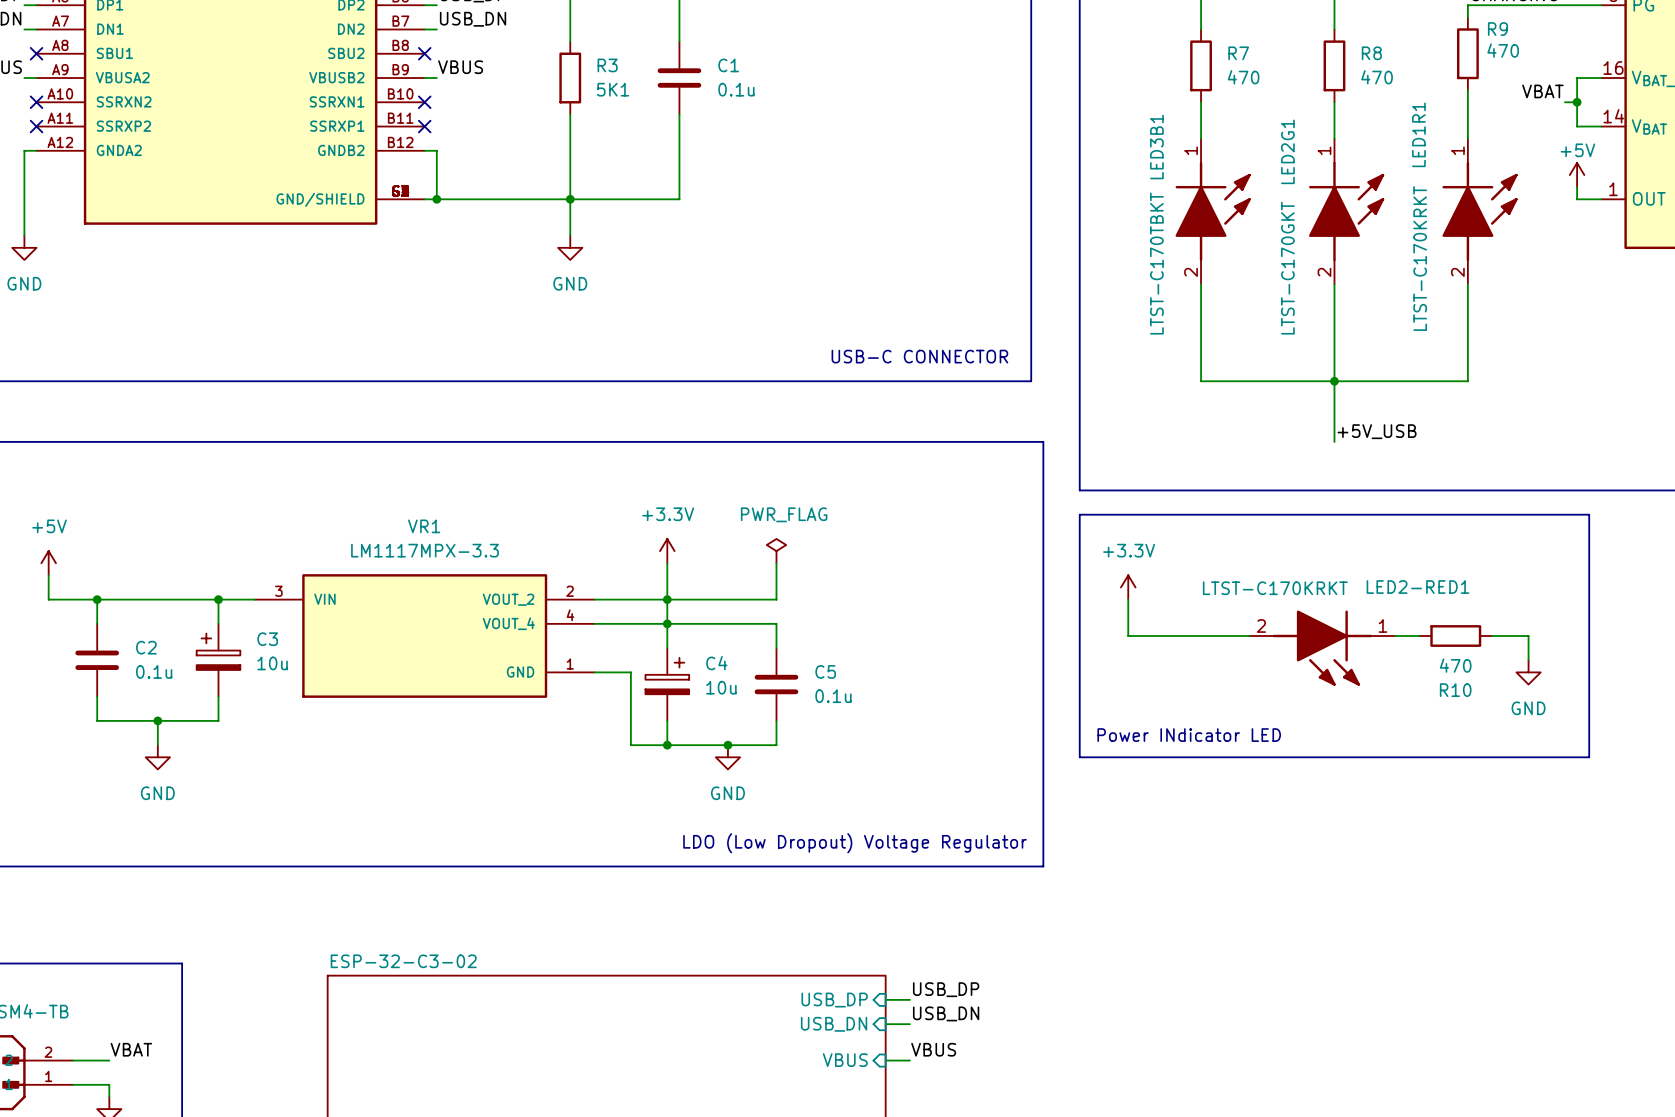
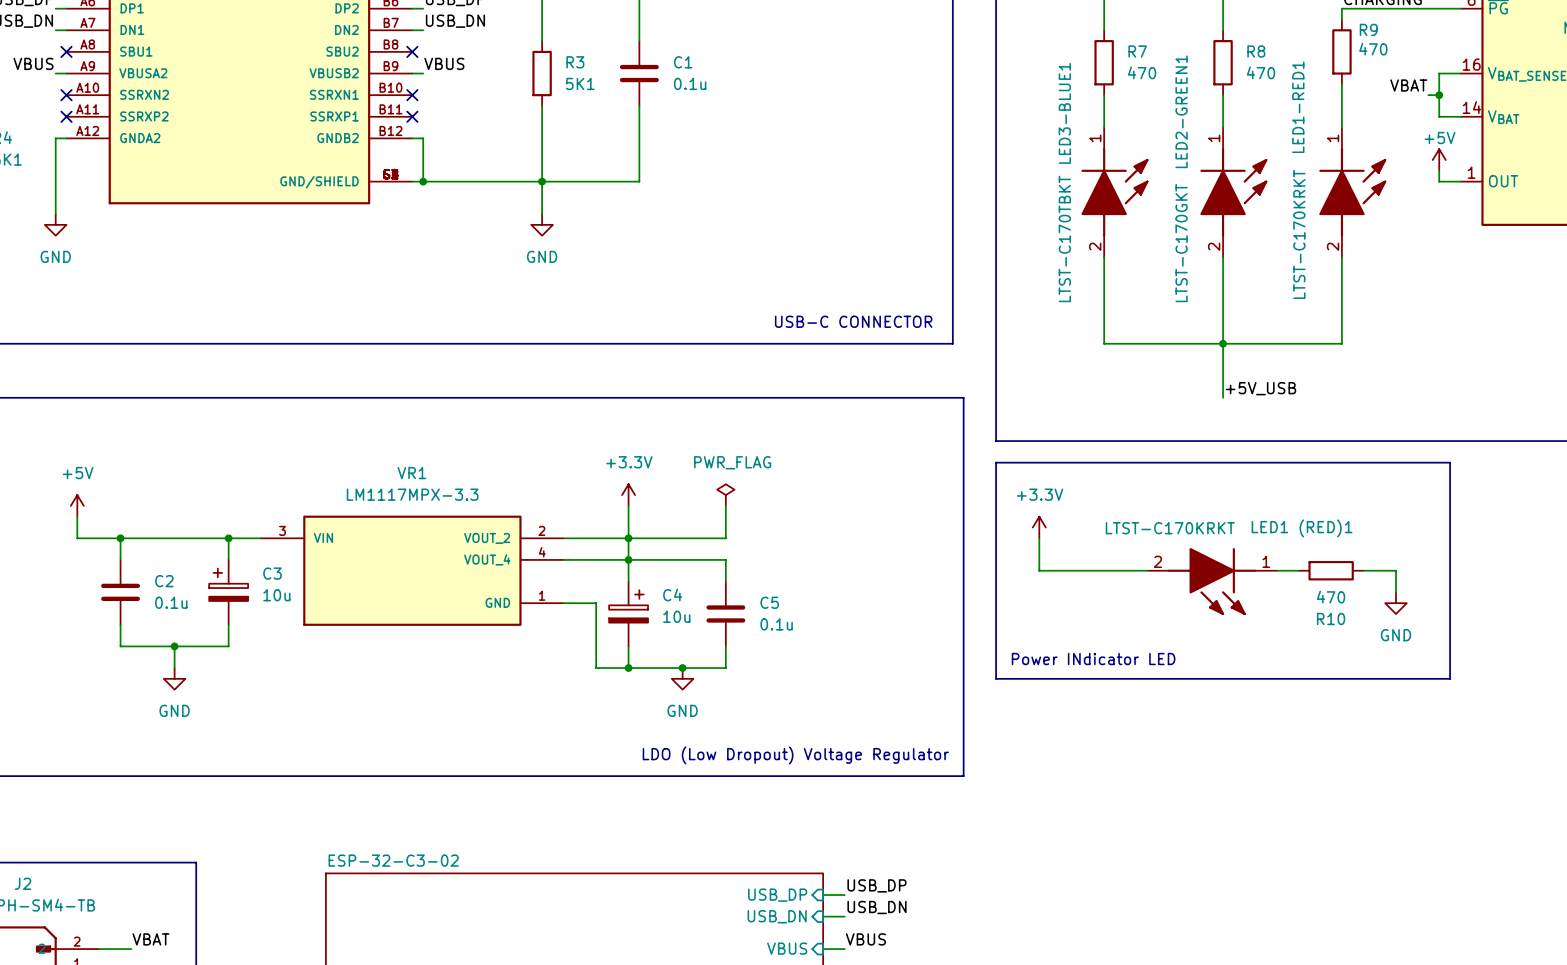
LED1R1 name: LED1R1 (1418, 134) -> LED1-RED1 (1298, 107)
LED3B1 name: LED3B1 (1156, 147) -> LED3-BLUE1 (1064, 113)
LED2G1 name: LED2G1 (1287, 151) -> LED2-GREEN1 (1181, 111)
LED2-RED1 name: LED2-RED1 (1417, 587) -> LED1 (RED)1 (1302, 528)

